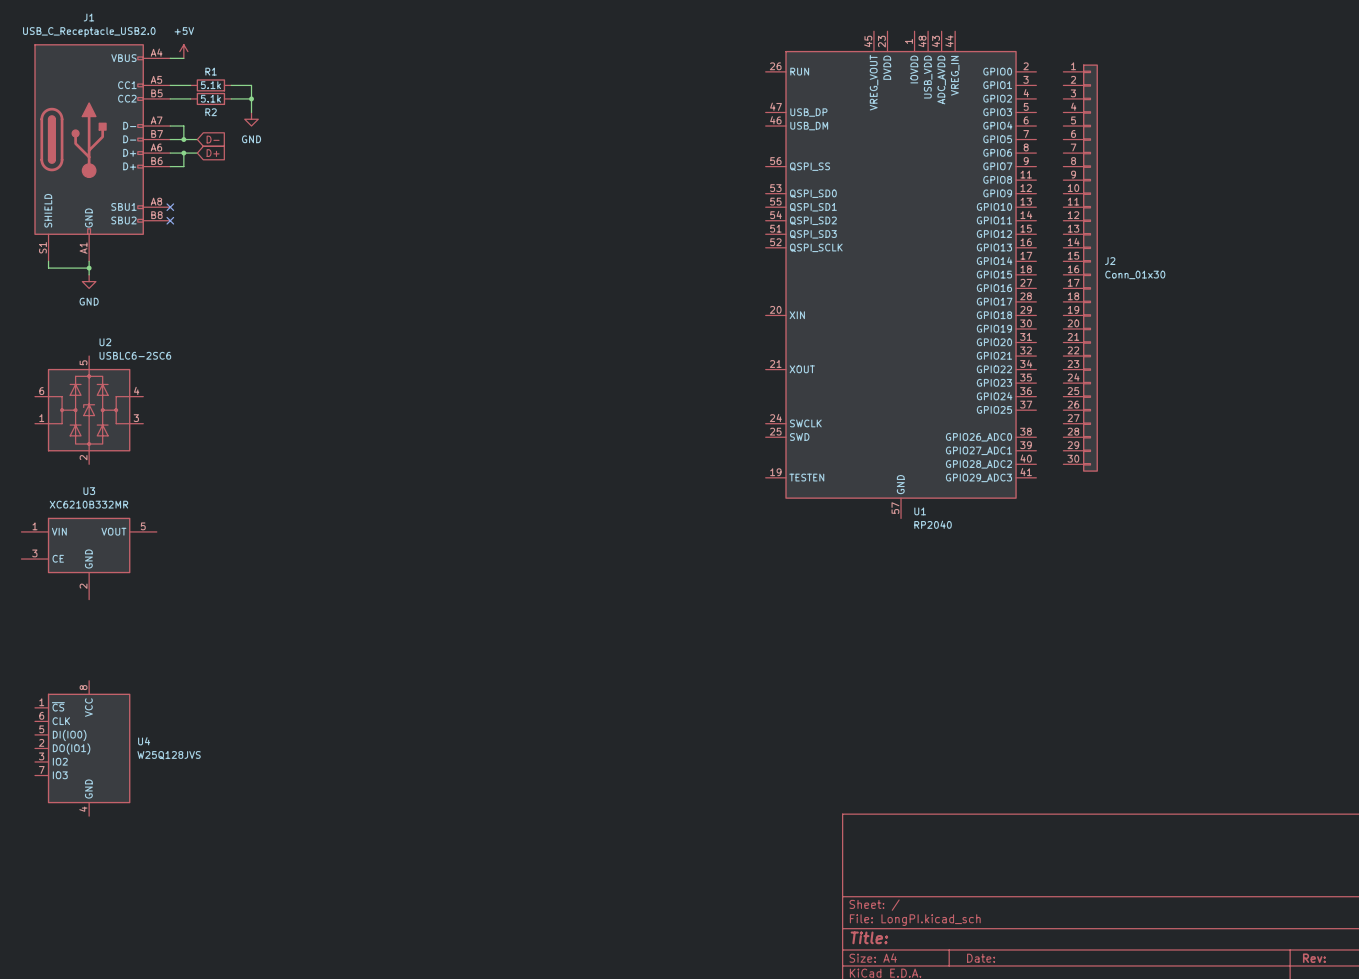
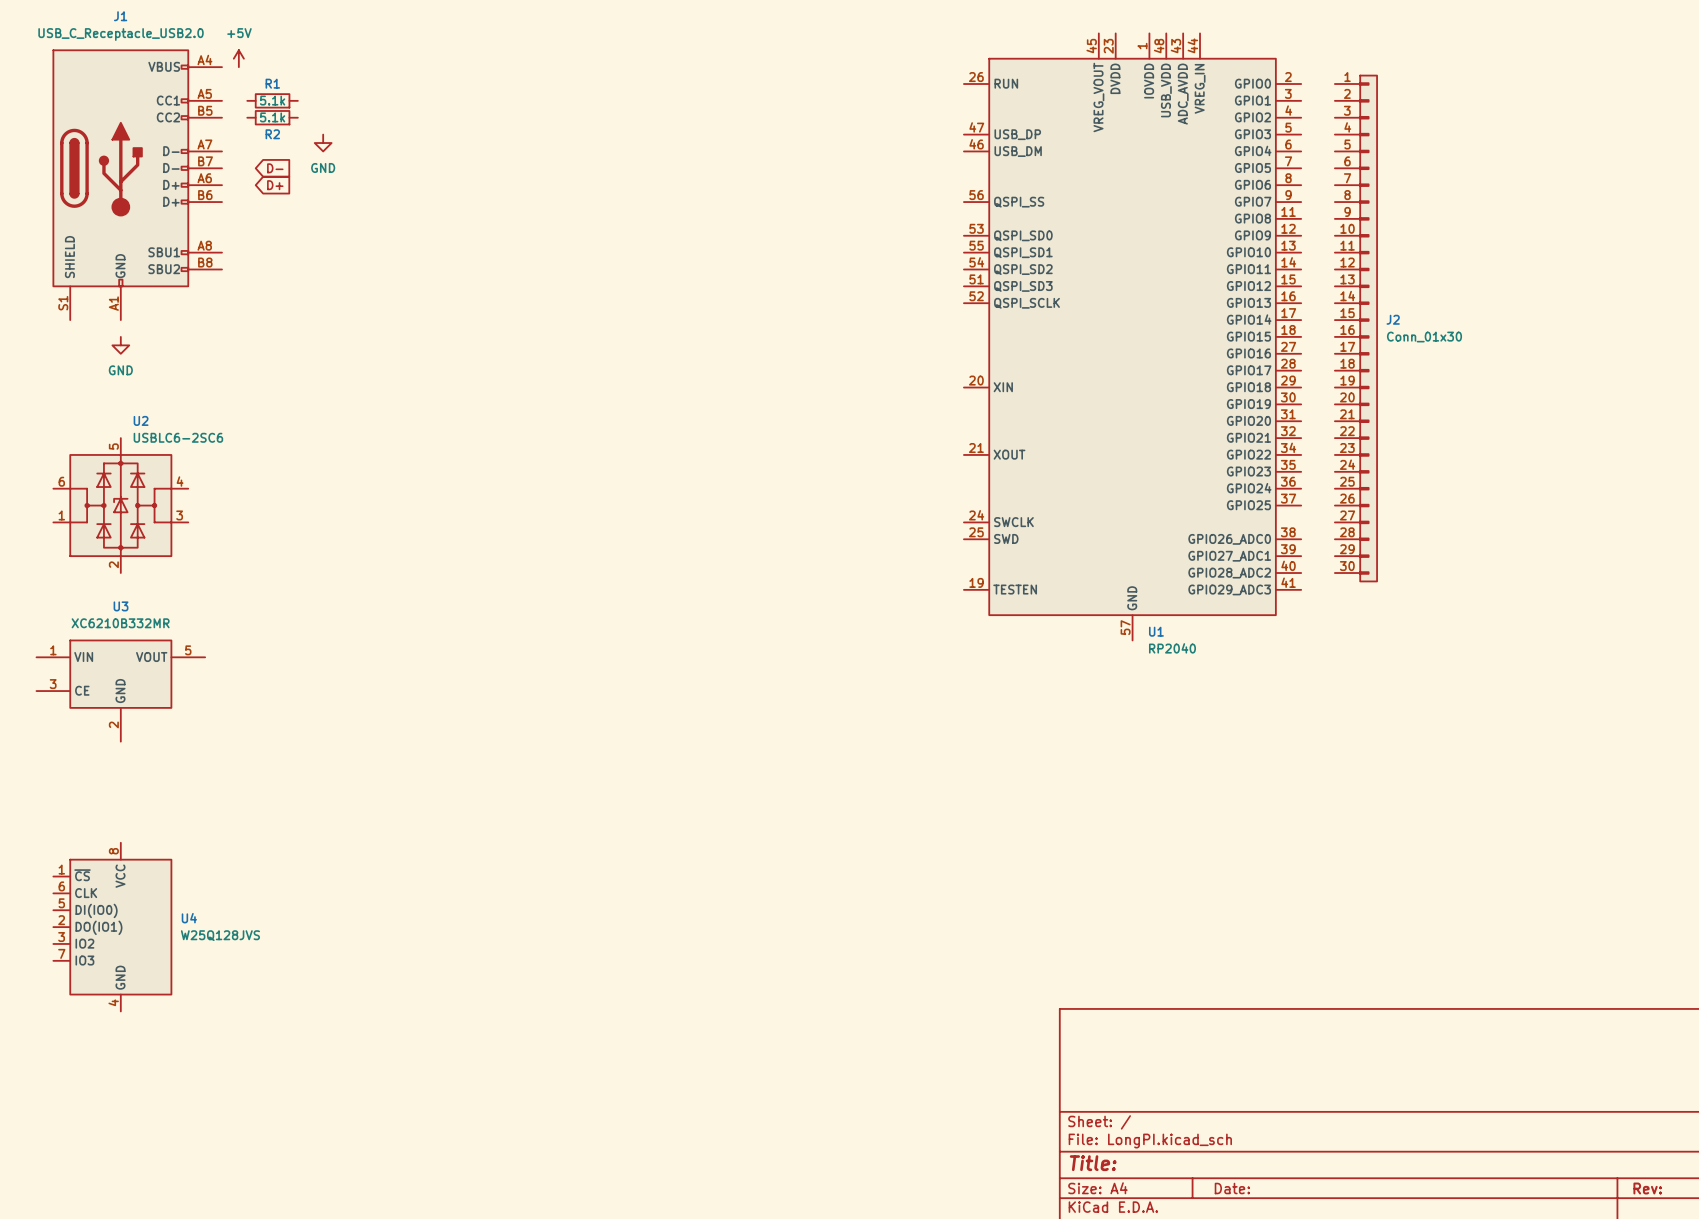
wire: (170, 58) (183, 58) -> none
wire: (170, 85) (190, 85) -> none
wire: (231, 85) (251, 85) (251, 112) -> none
wire: (170, 98) (190, 98) -> none
wire: (231, 98) (251, 98) -> none
junction: (251, 98) -> none
wire: (170, 126) (183, 126) (183, 139) -> none
wire: (170, 139) (197, 139) -> none
junction: (183, 139) -> none
wire: (170, 153) (197, 153) -> none
wire: (183, 153) (183, 166) (170, 166) -> none
junction: (183, 153) -> none
no-connect mark: (170, 207) -> none
no-connect mark: (170, 220) -> none
wire: (48, 261) (48, 268) (89, 268) -> none
wire: (89, 261) (89, 274) -> none
junction: (89, 268) -> none

